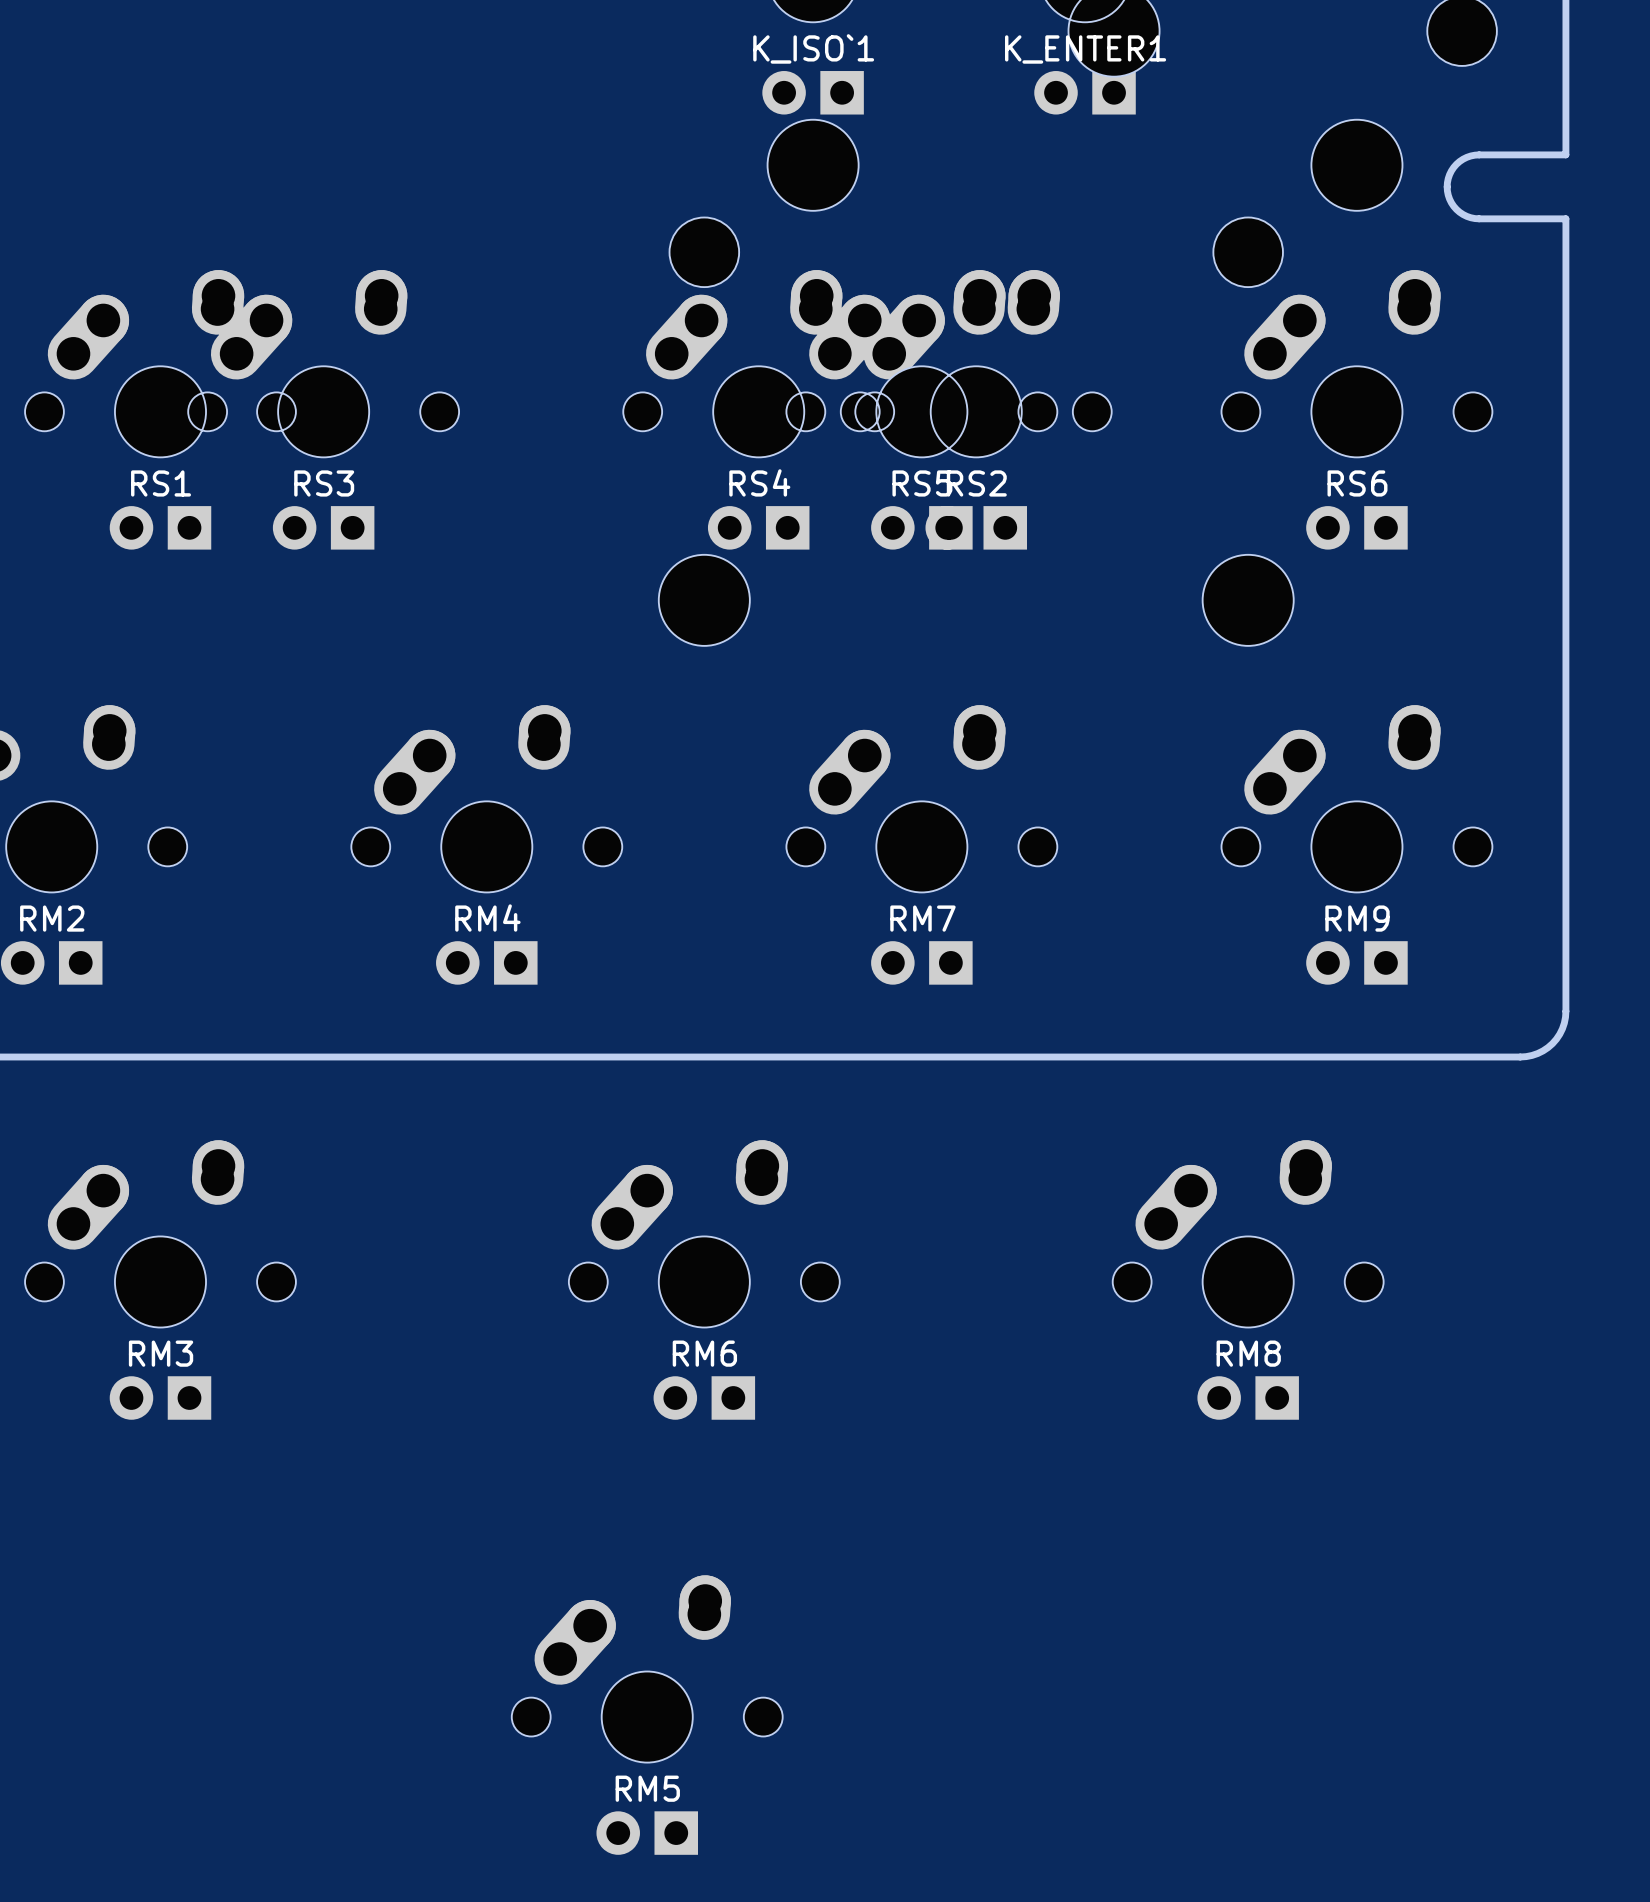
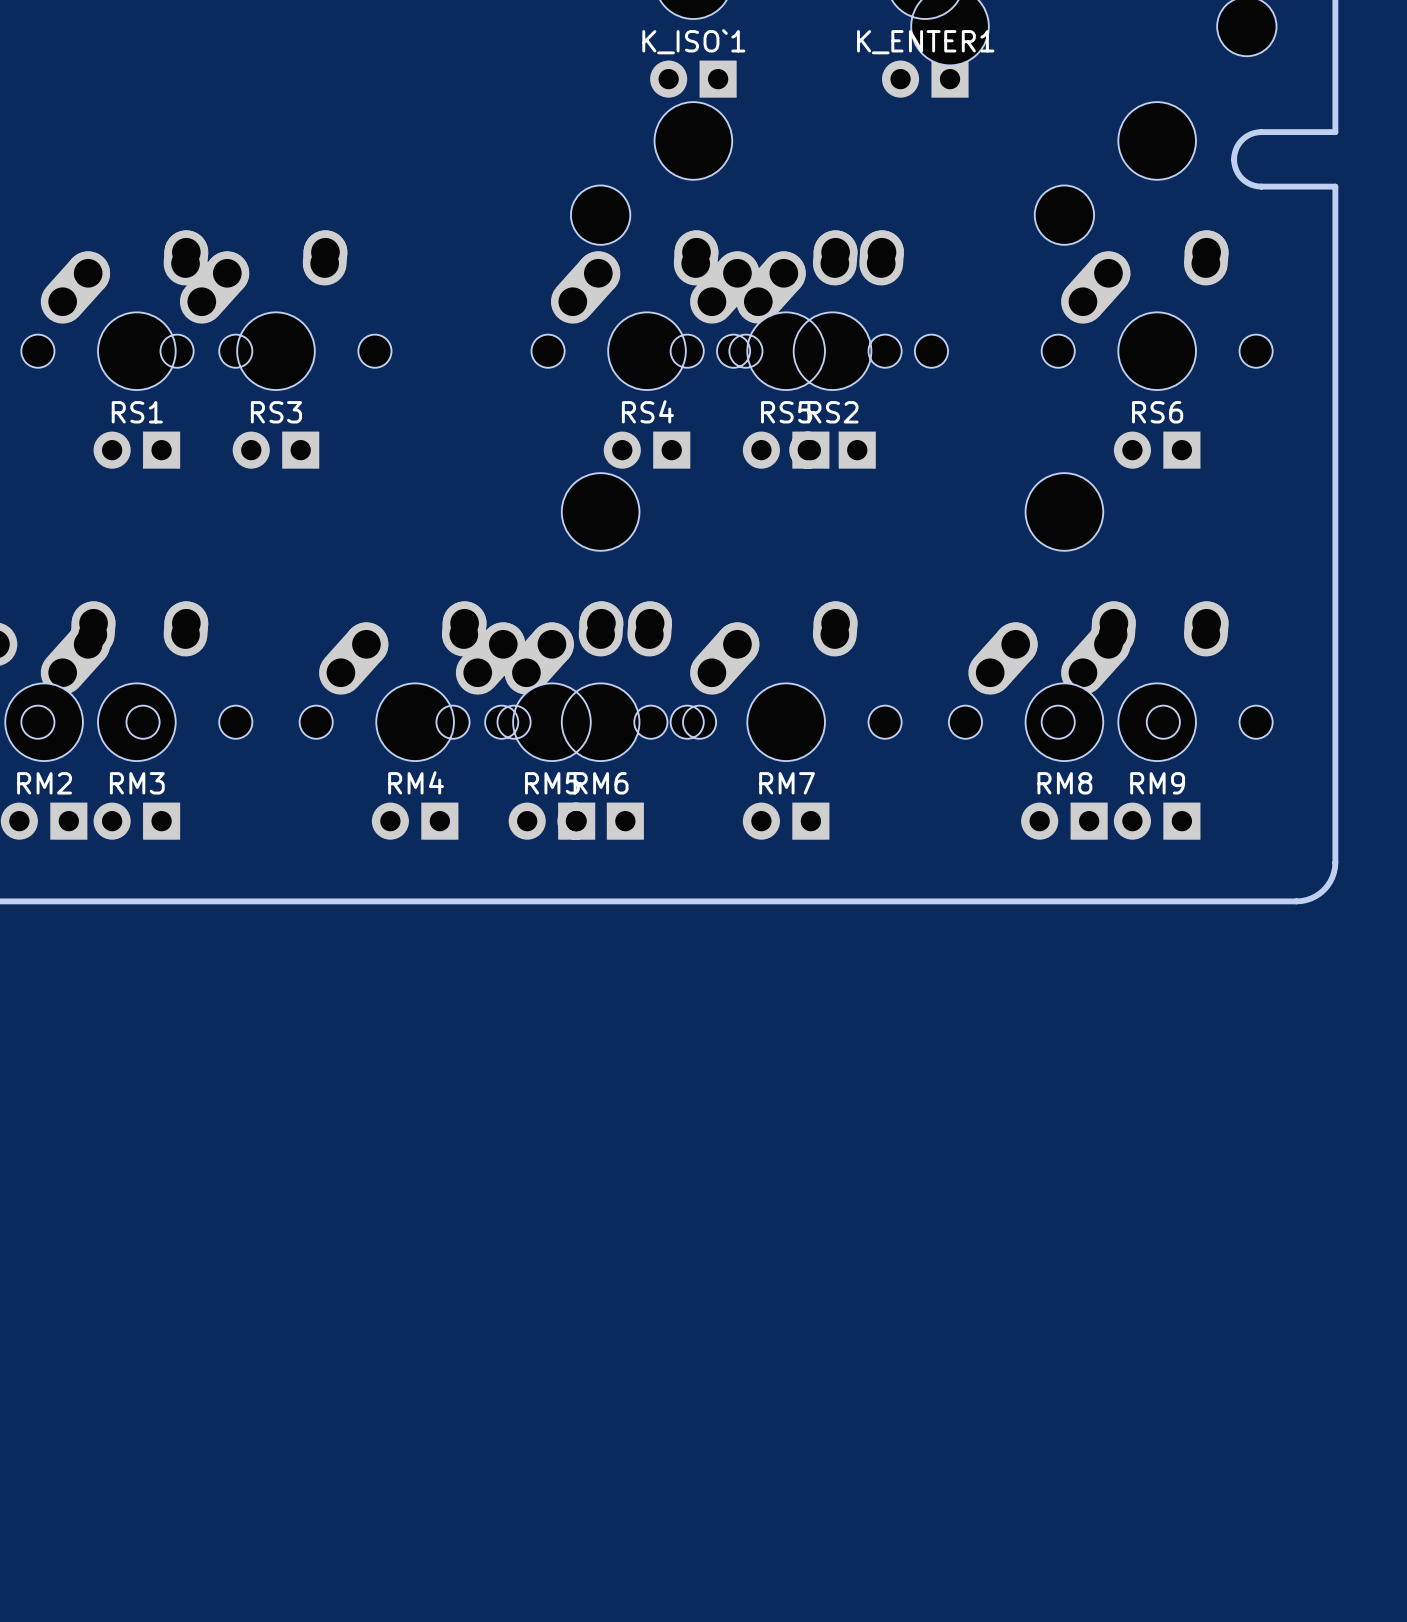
RM3 position: (160, 1280) -> (136, 720)
RM6 position: (704, 1280) -> (600, 720)
RM8 position: (1248, 1280) -> (1064, 720)
RM5 position: (647, 1715) -> (551, 720)

